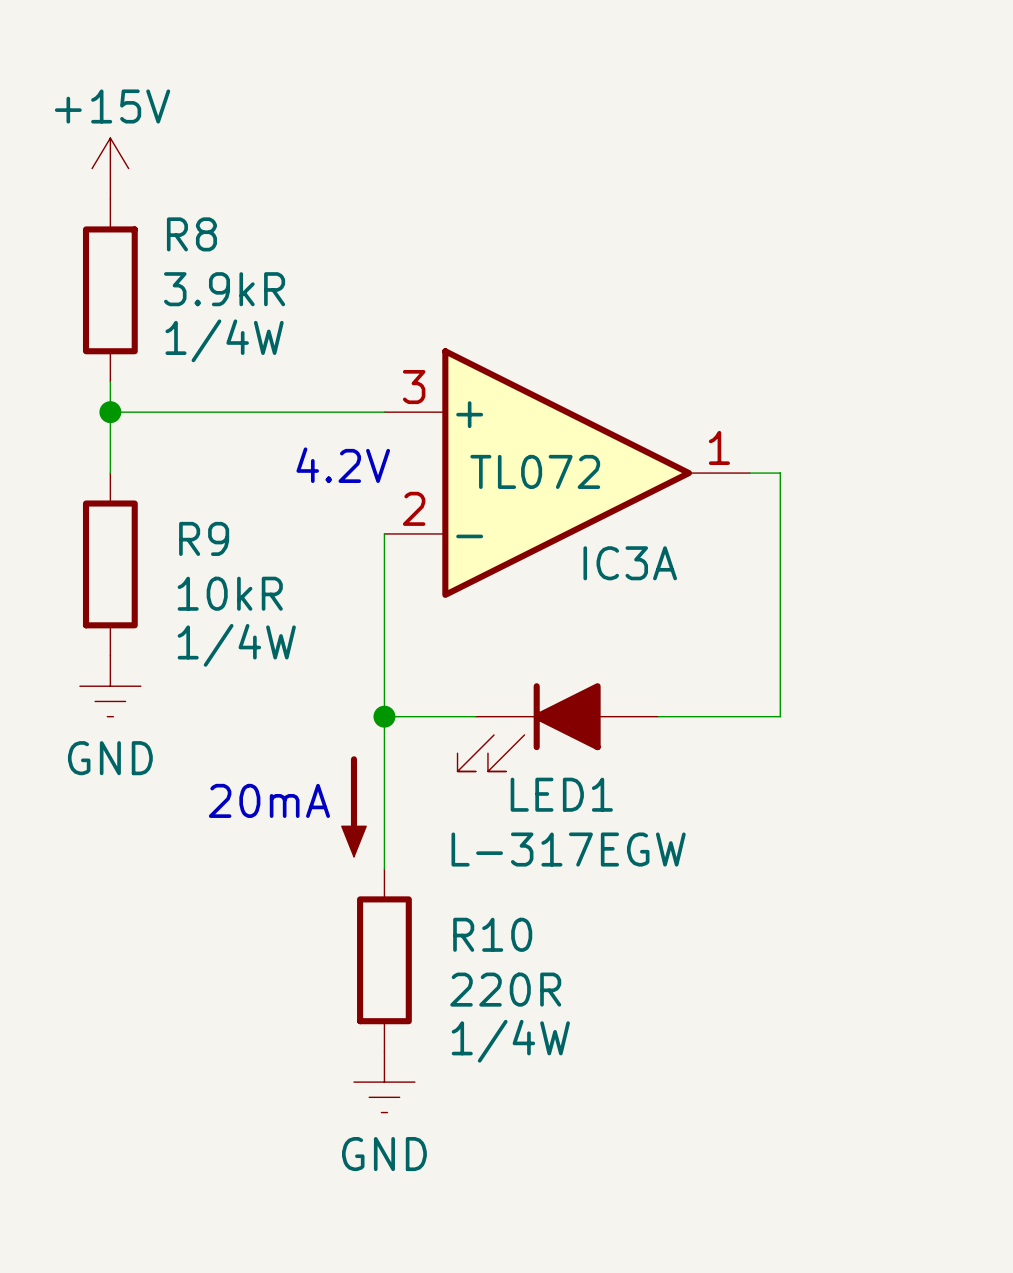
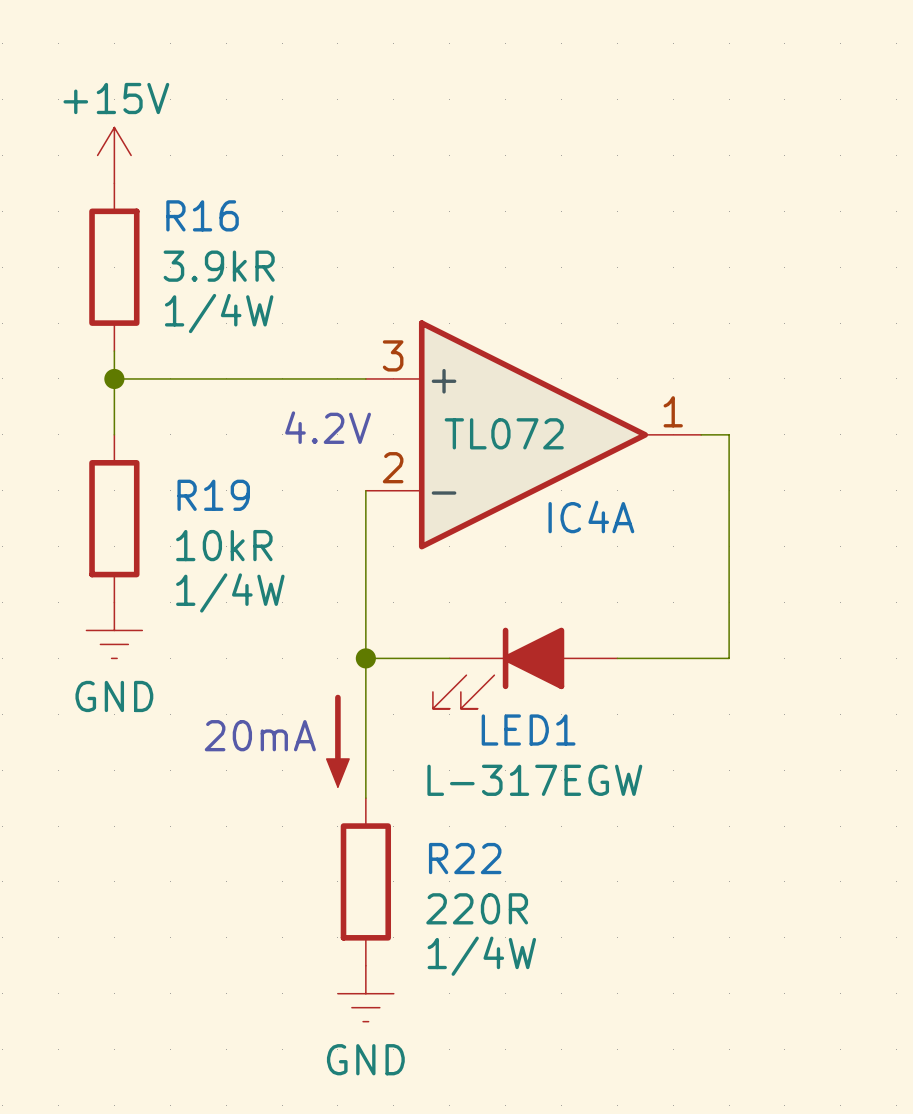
R8 name: R8 (191, 234) -> R16 (202, 215)
R9 name: R9 (204, 538) -> R19 (213, 495)
IC3A name: IC3A (630, 563) -> IC4A (591, 516)
R10 name: R10 (492, 934) -> R22 (465, 858)

